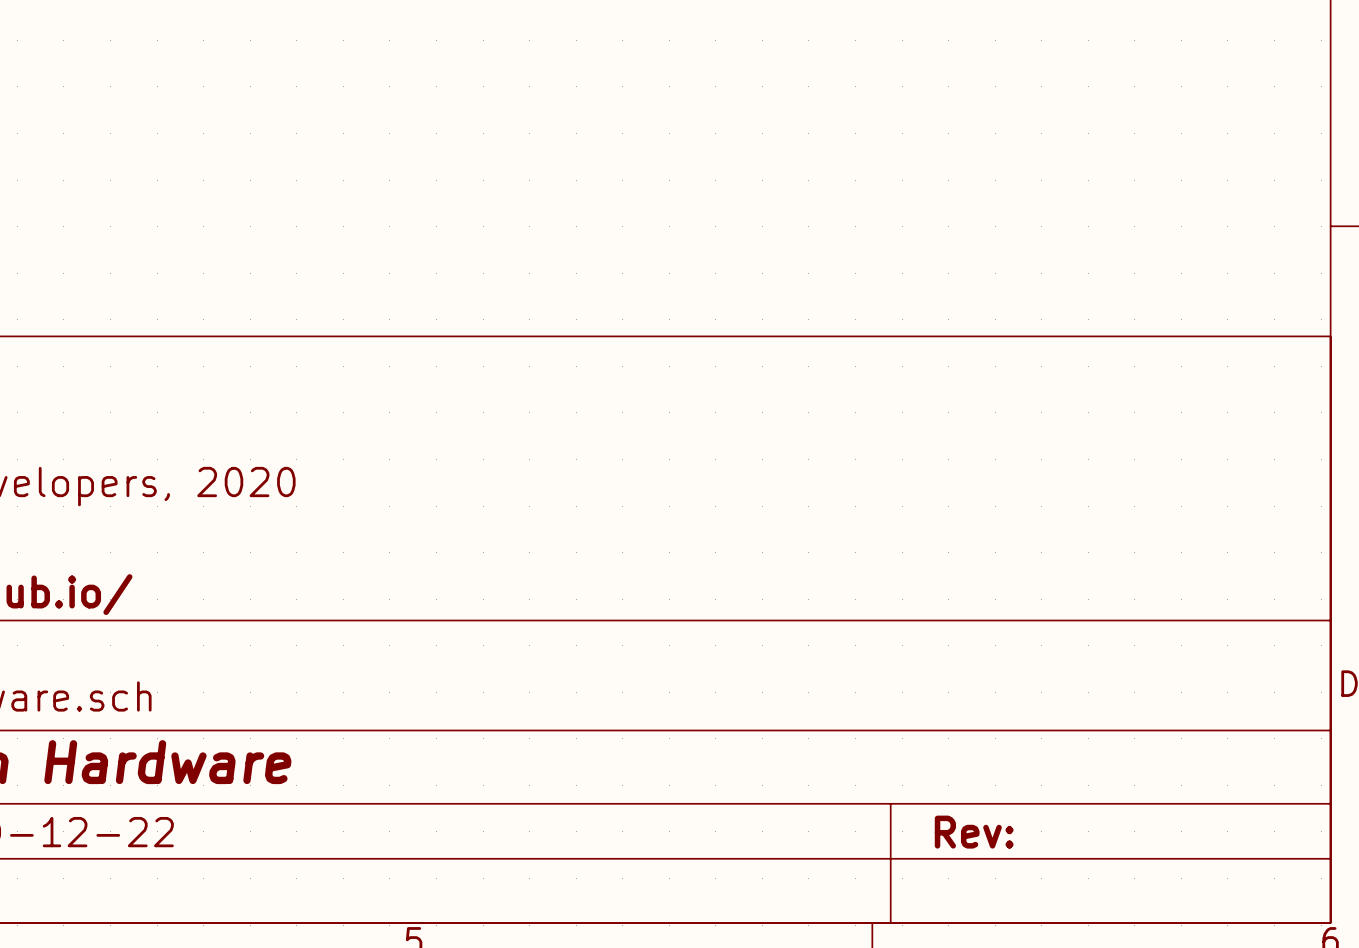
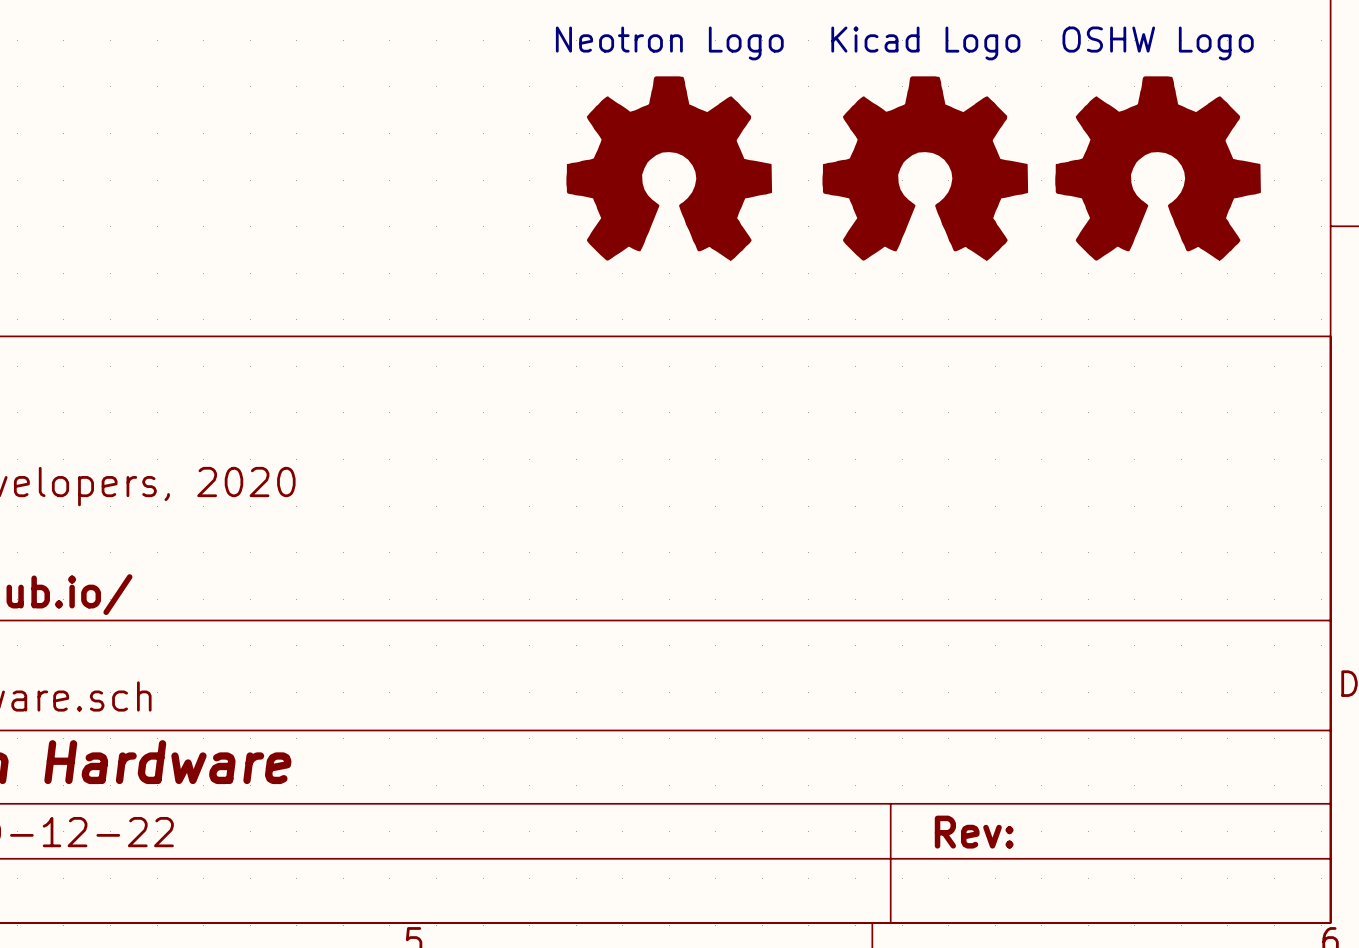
part: none -> Neotron Logo (669, 168)
part: none -> Kicad Logo (925, 168)
part: none -> OSHW Logo (1158, 168)

